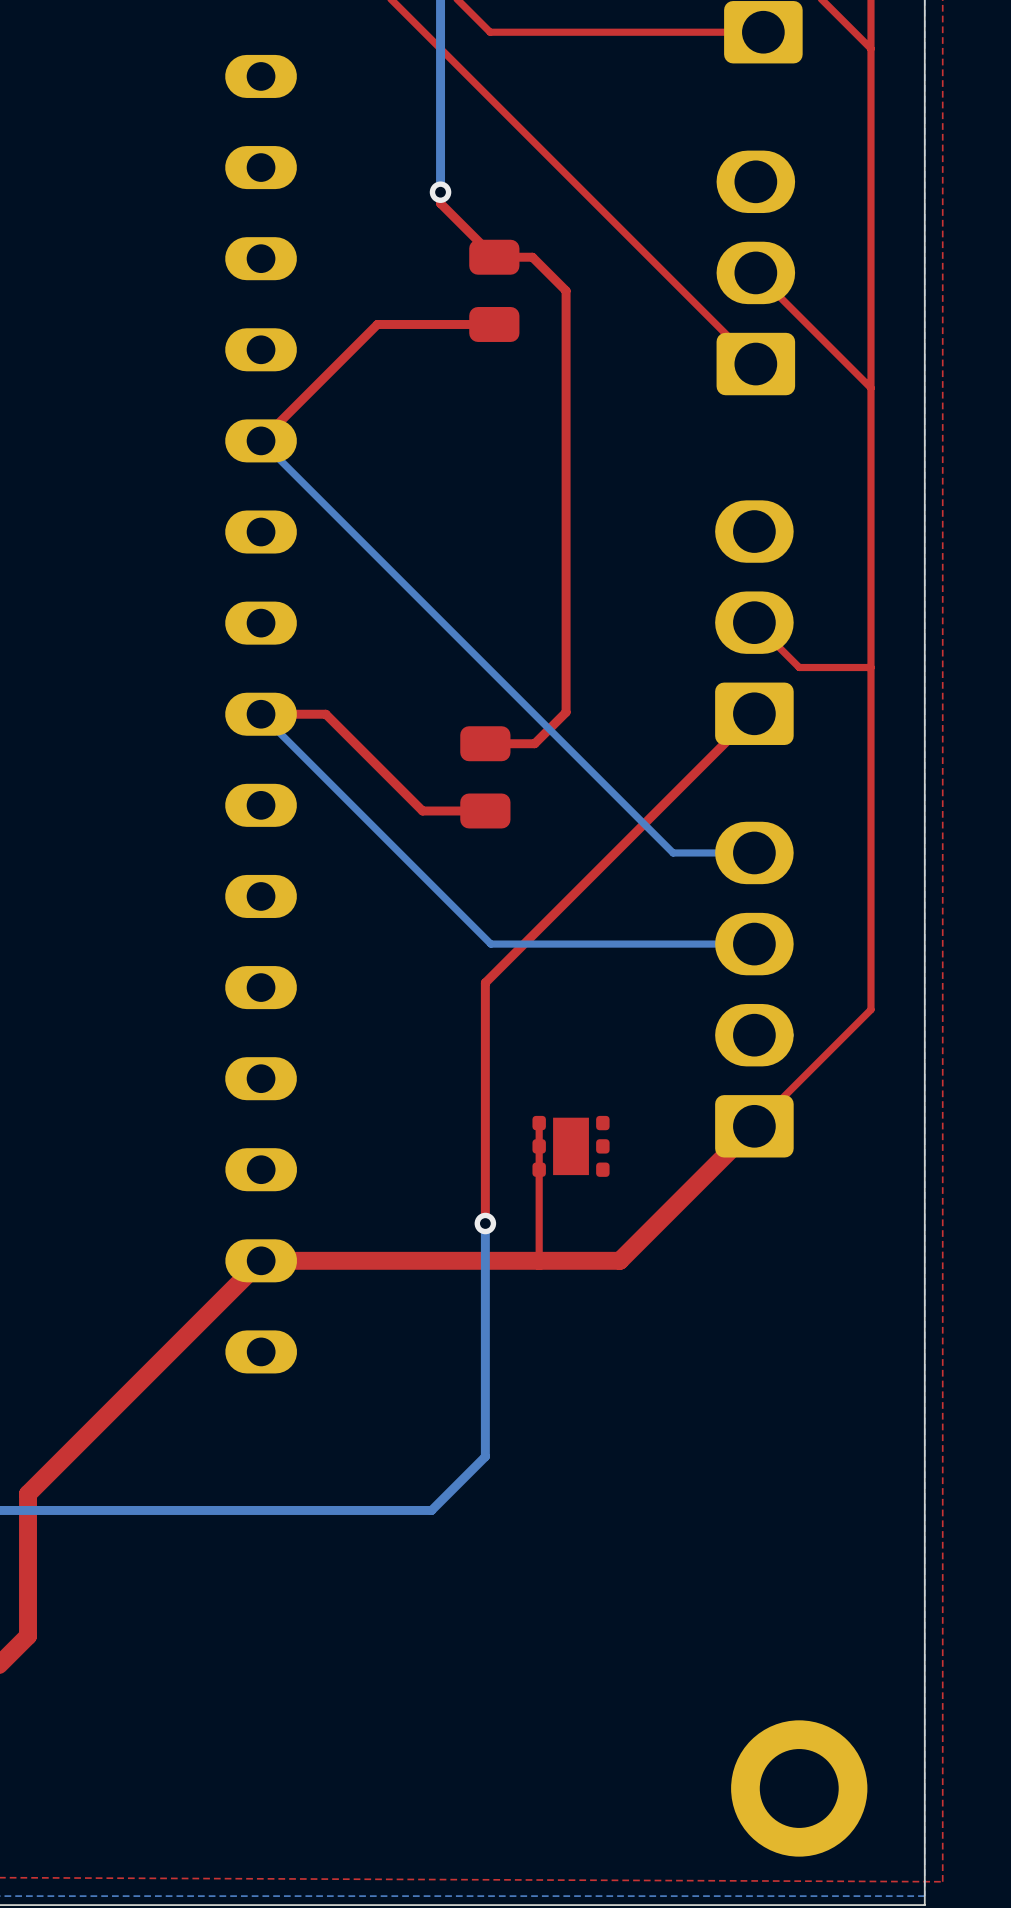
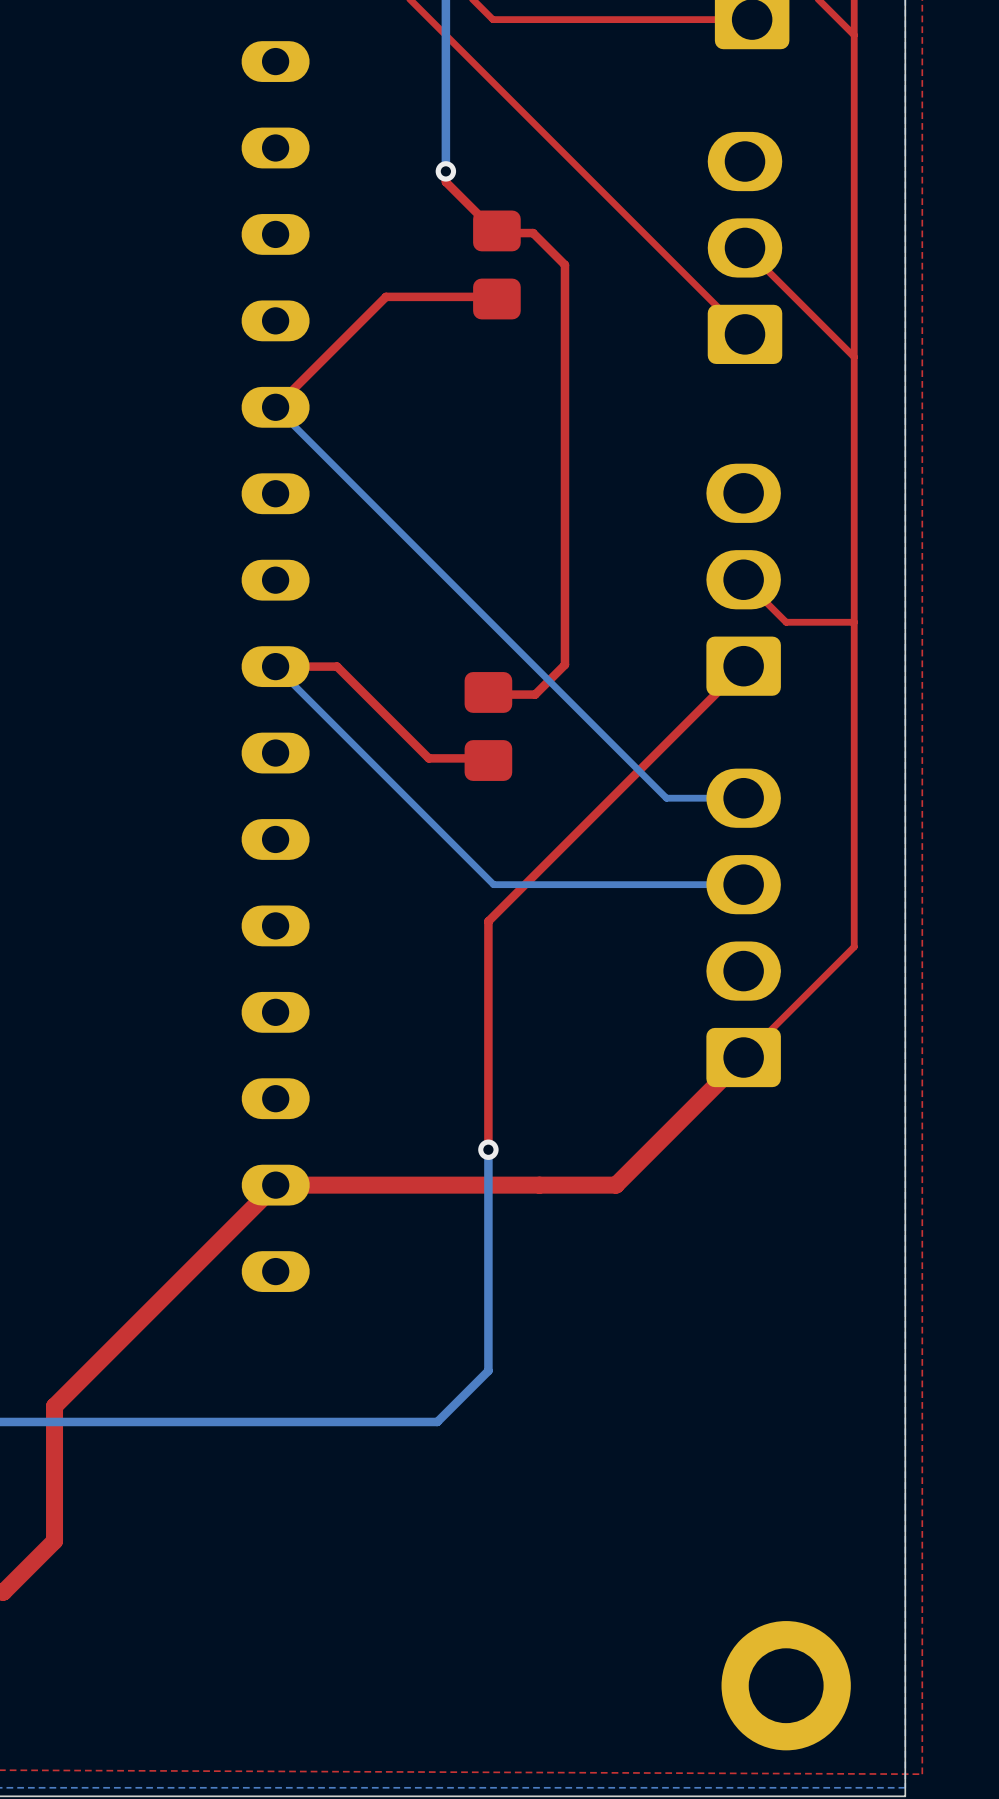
part footprint: [469, 239, 520, 342] -> [473, 210, 521, 320]
part footprint: [460, 726, 511, 829] -> [464, 672, 513, 781]
top track: (539, 1123) (539, 1260) -> none
part: (571, 1146) -> none

